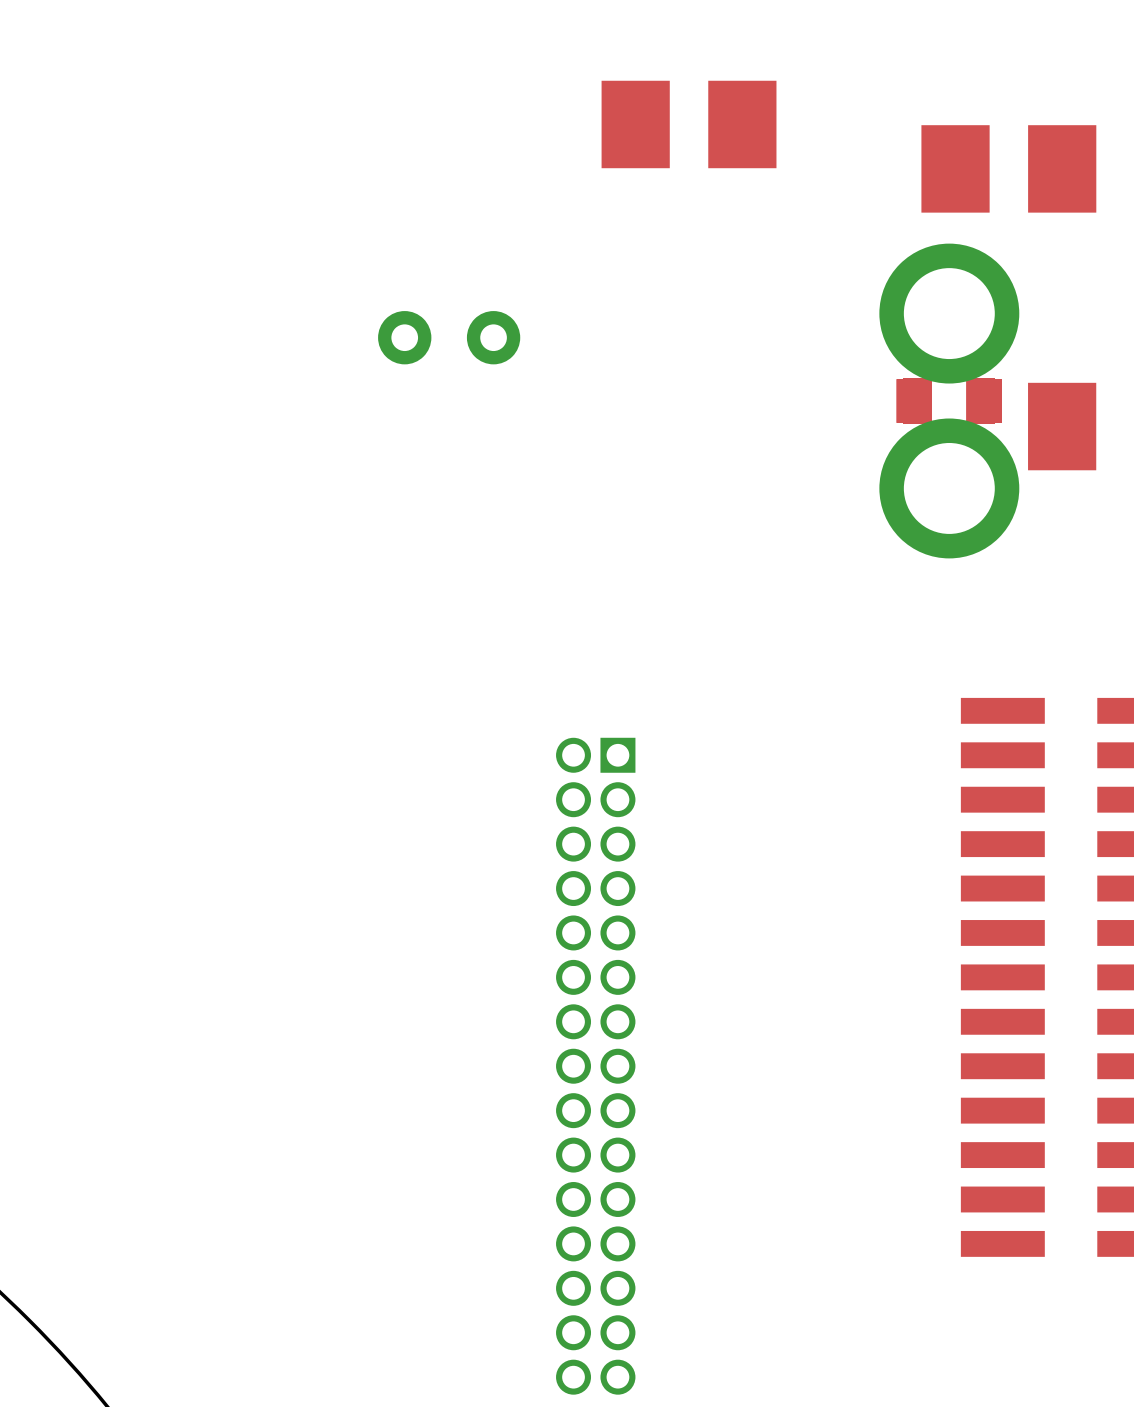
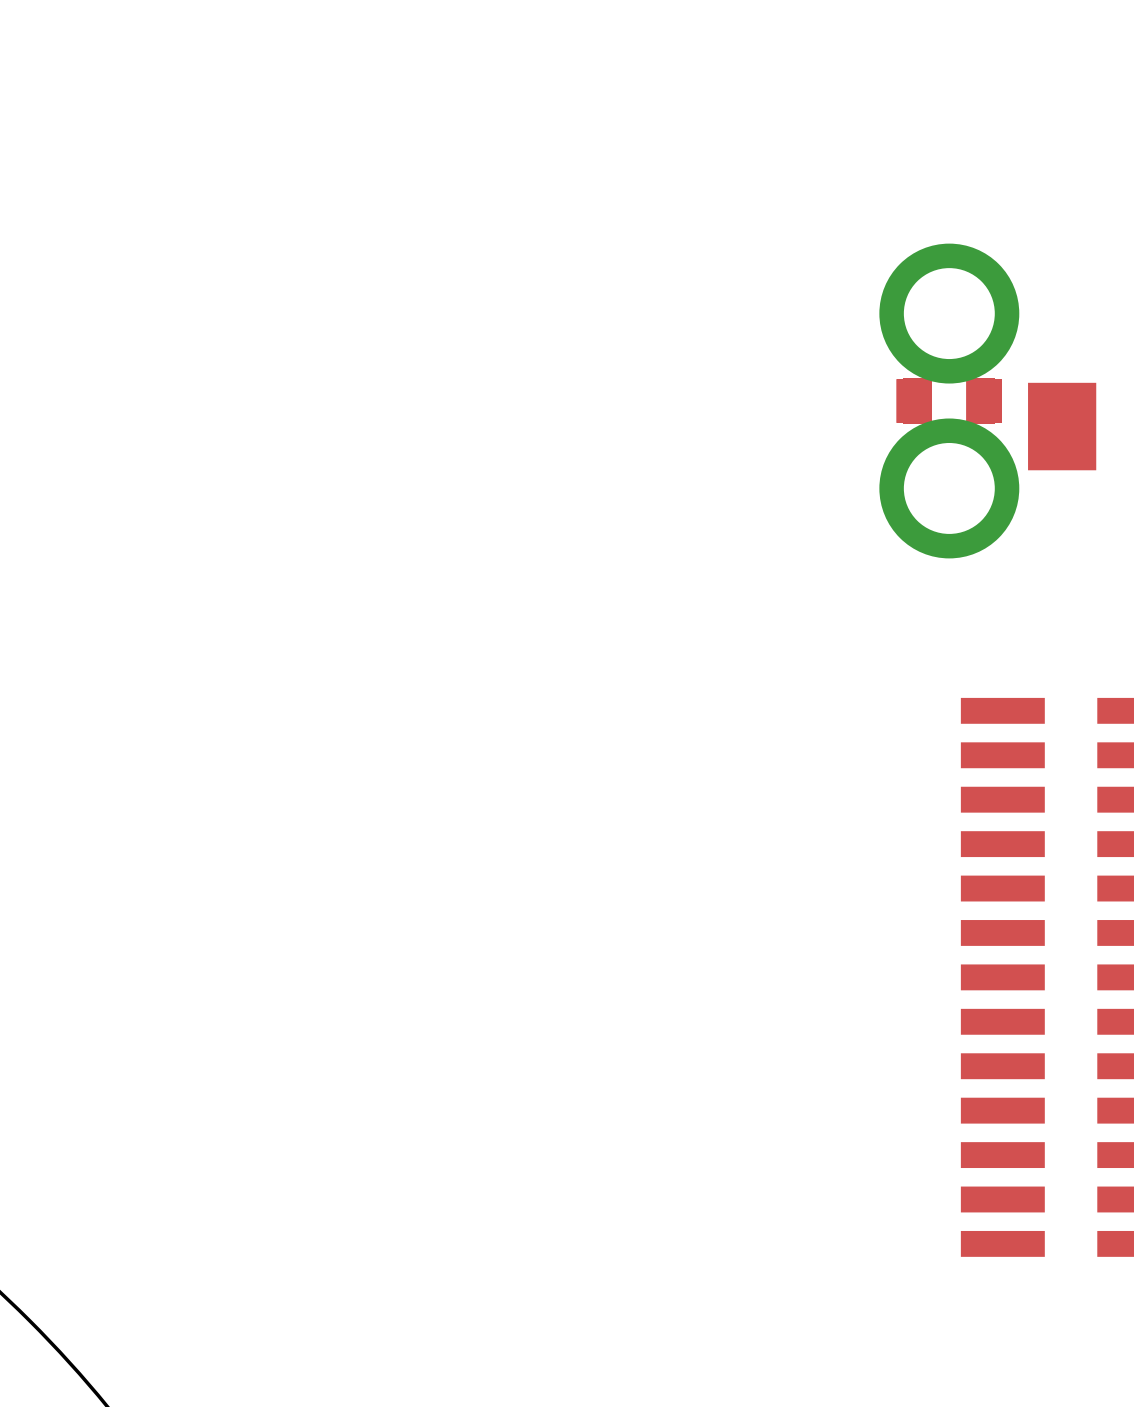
part: (689, 124) -> none
part: (1008, 168) -> none
part: (449, 337) -> none
part: (595, 1066) -> none

